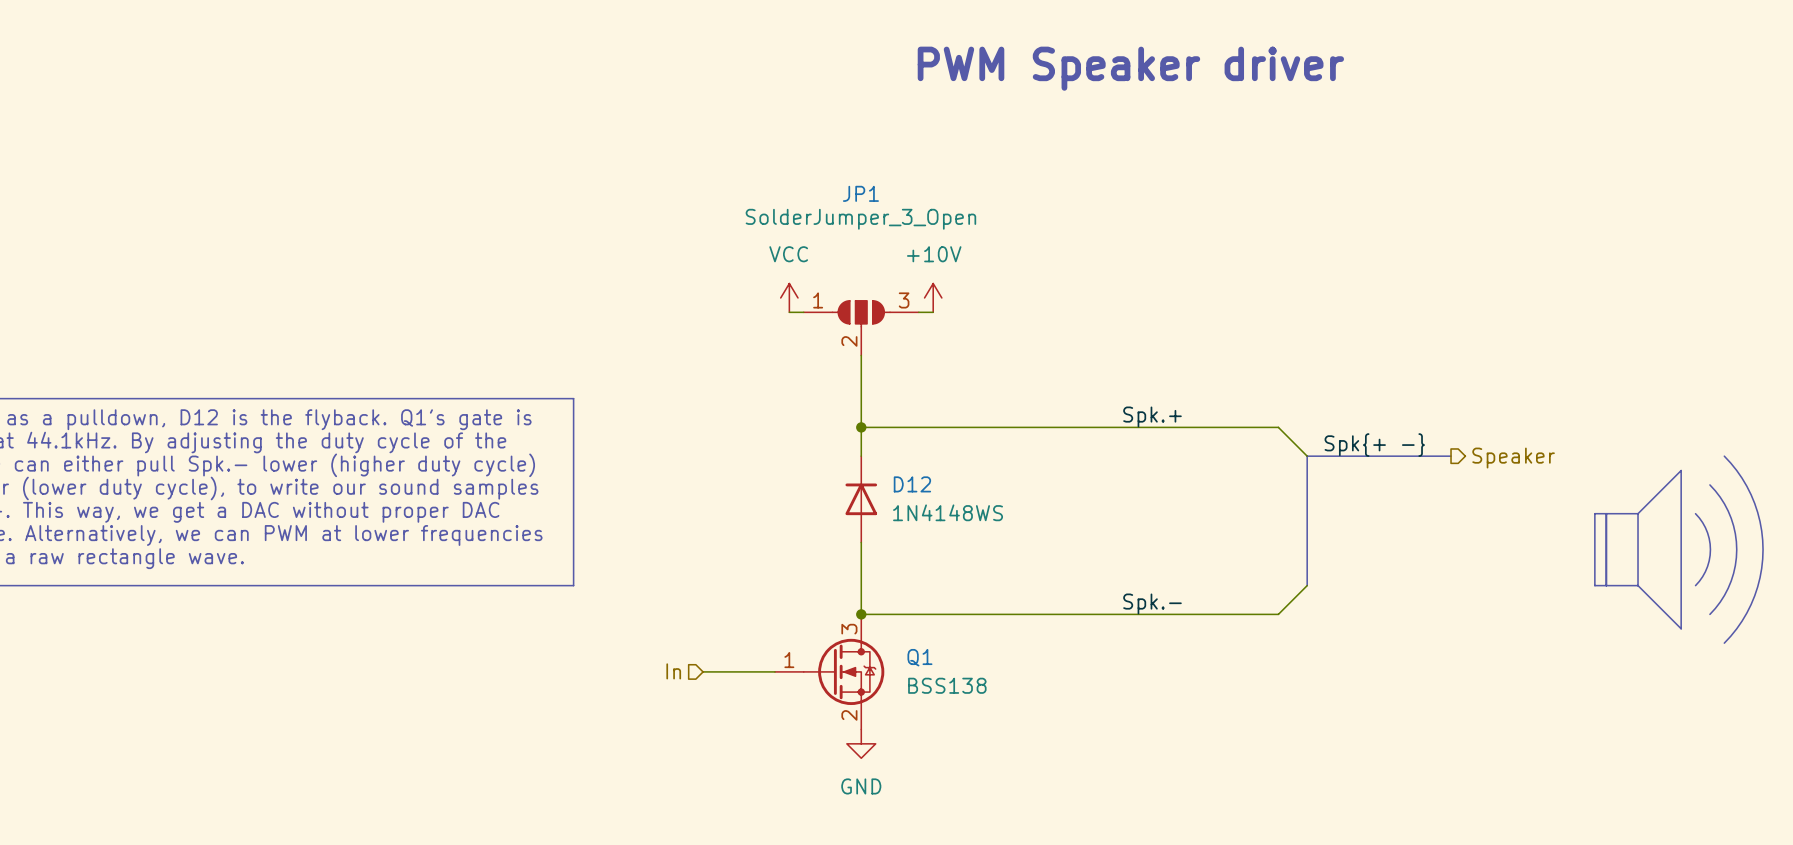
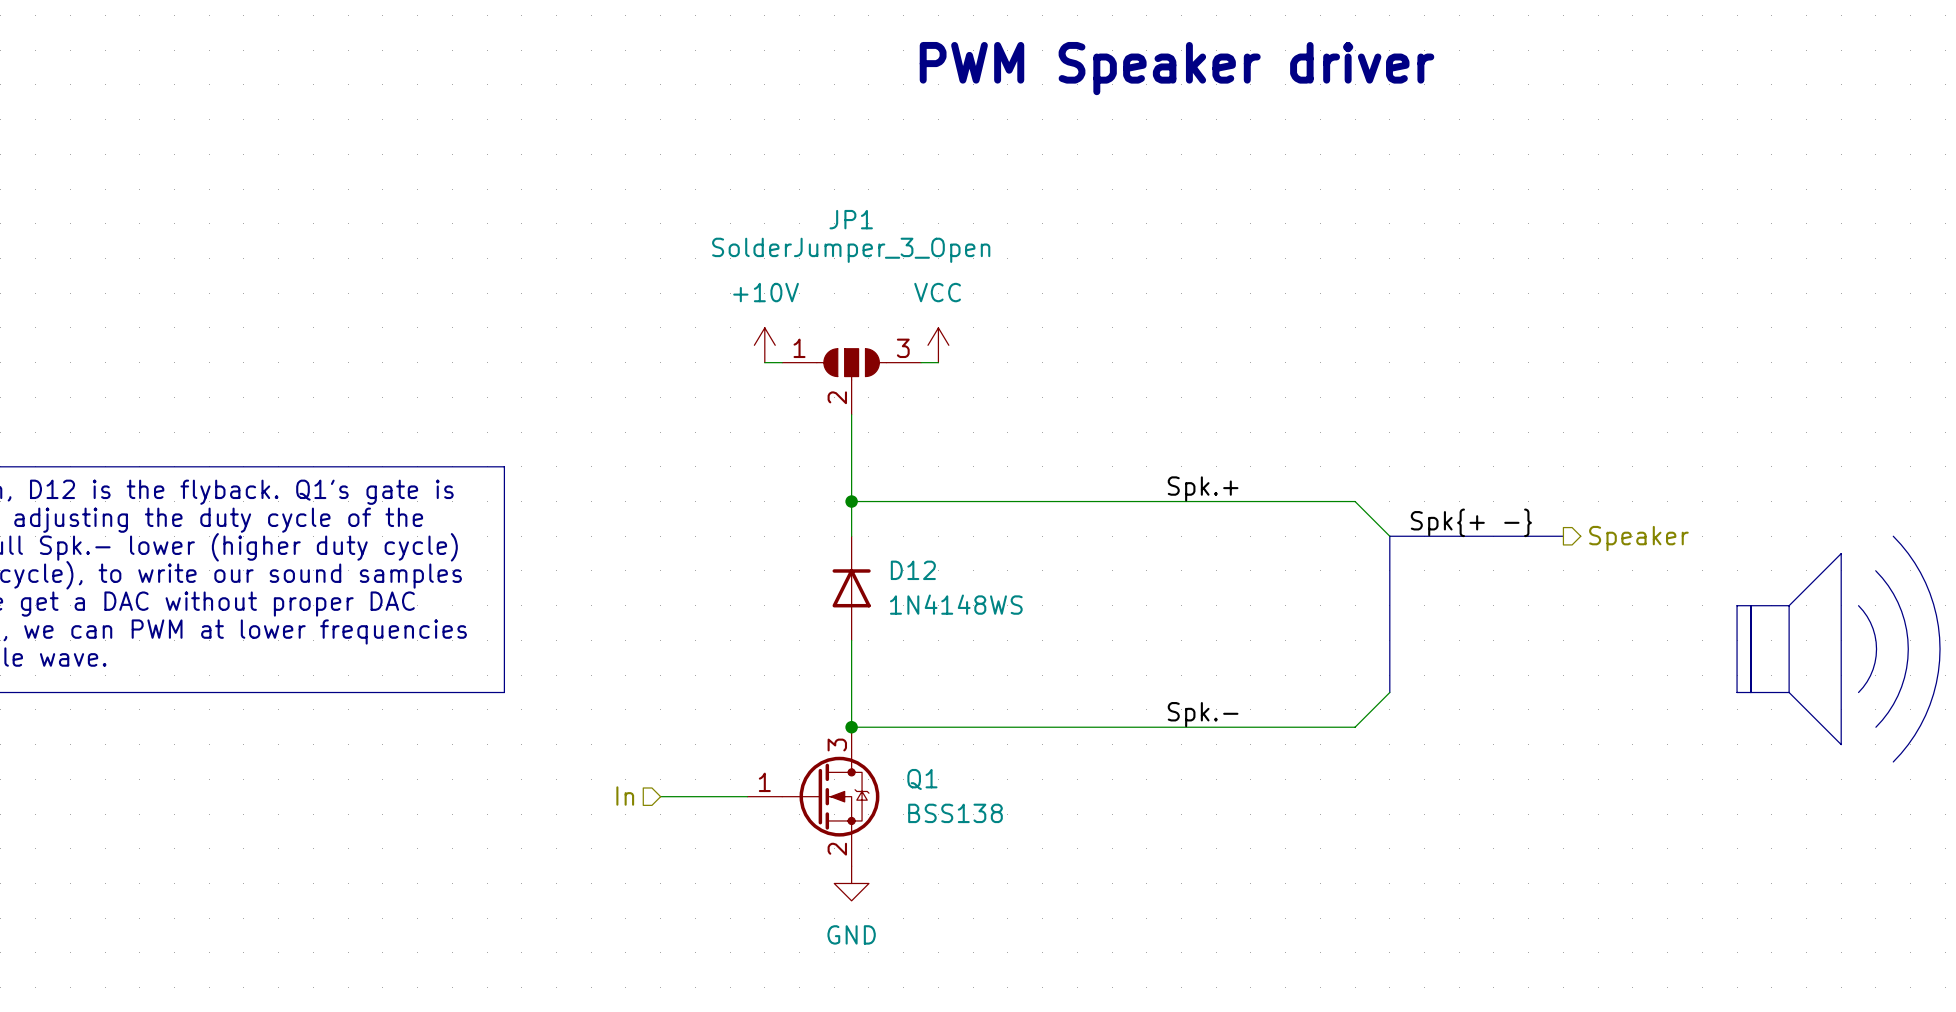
power symbol: VCC (789, 297) -> +10V (764, 345)
power symbol: +10V (933, 297) -> VCC (938, 345)

